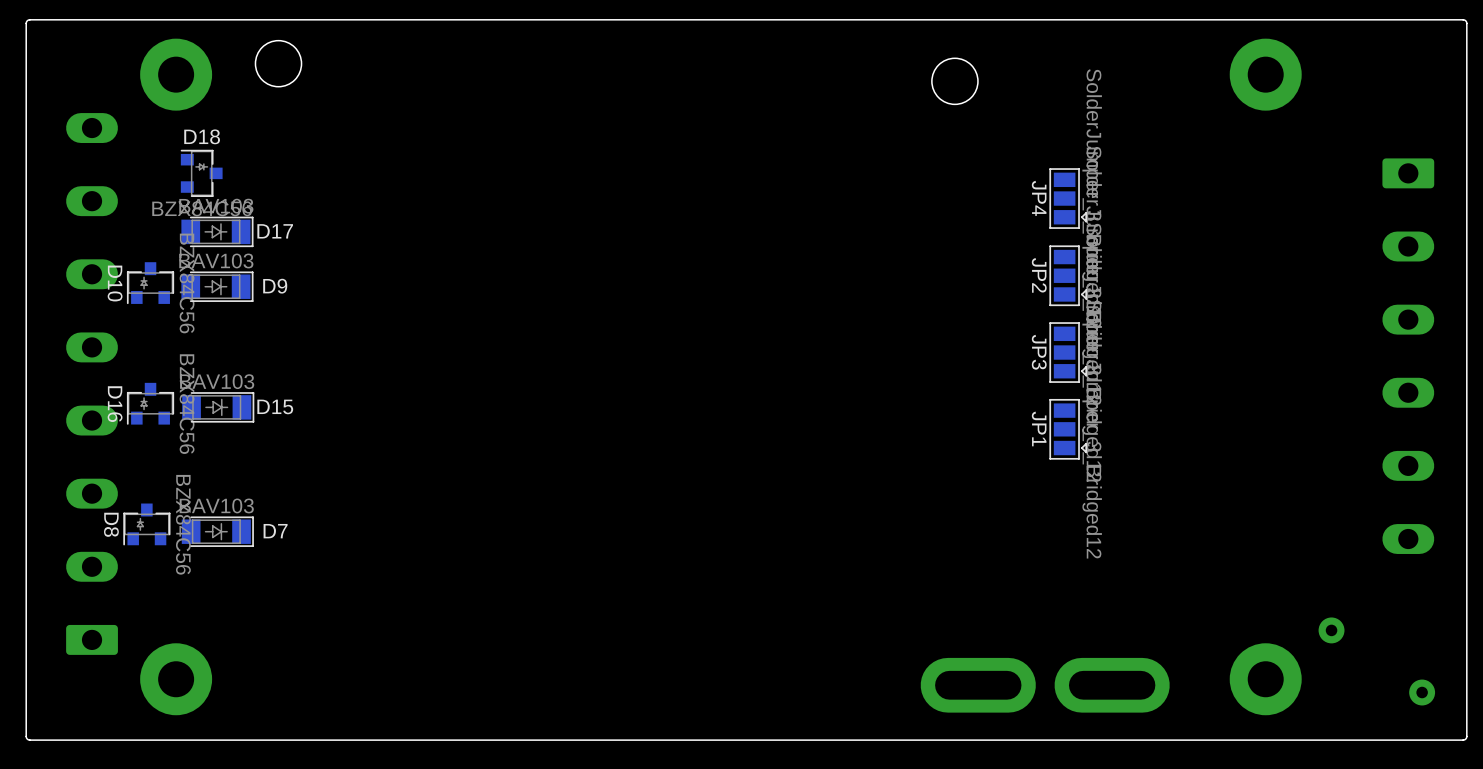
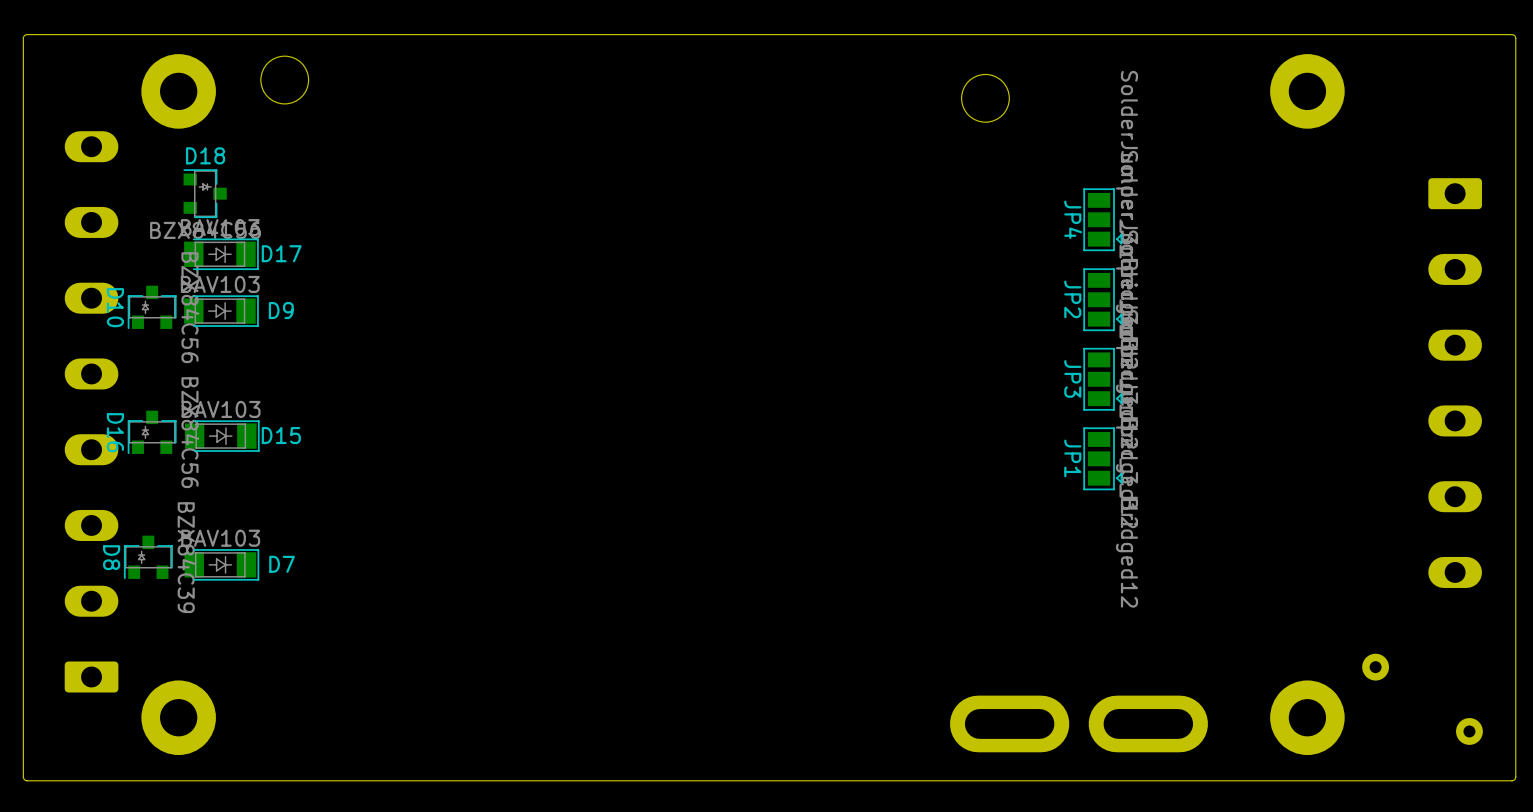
D8 value: BZX84C56 (183, 524) -> BZX84C39 (186, 557)

